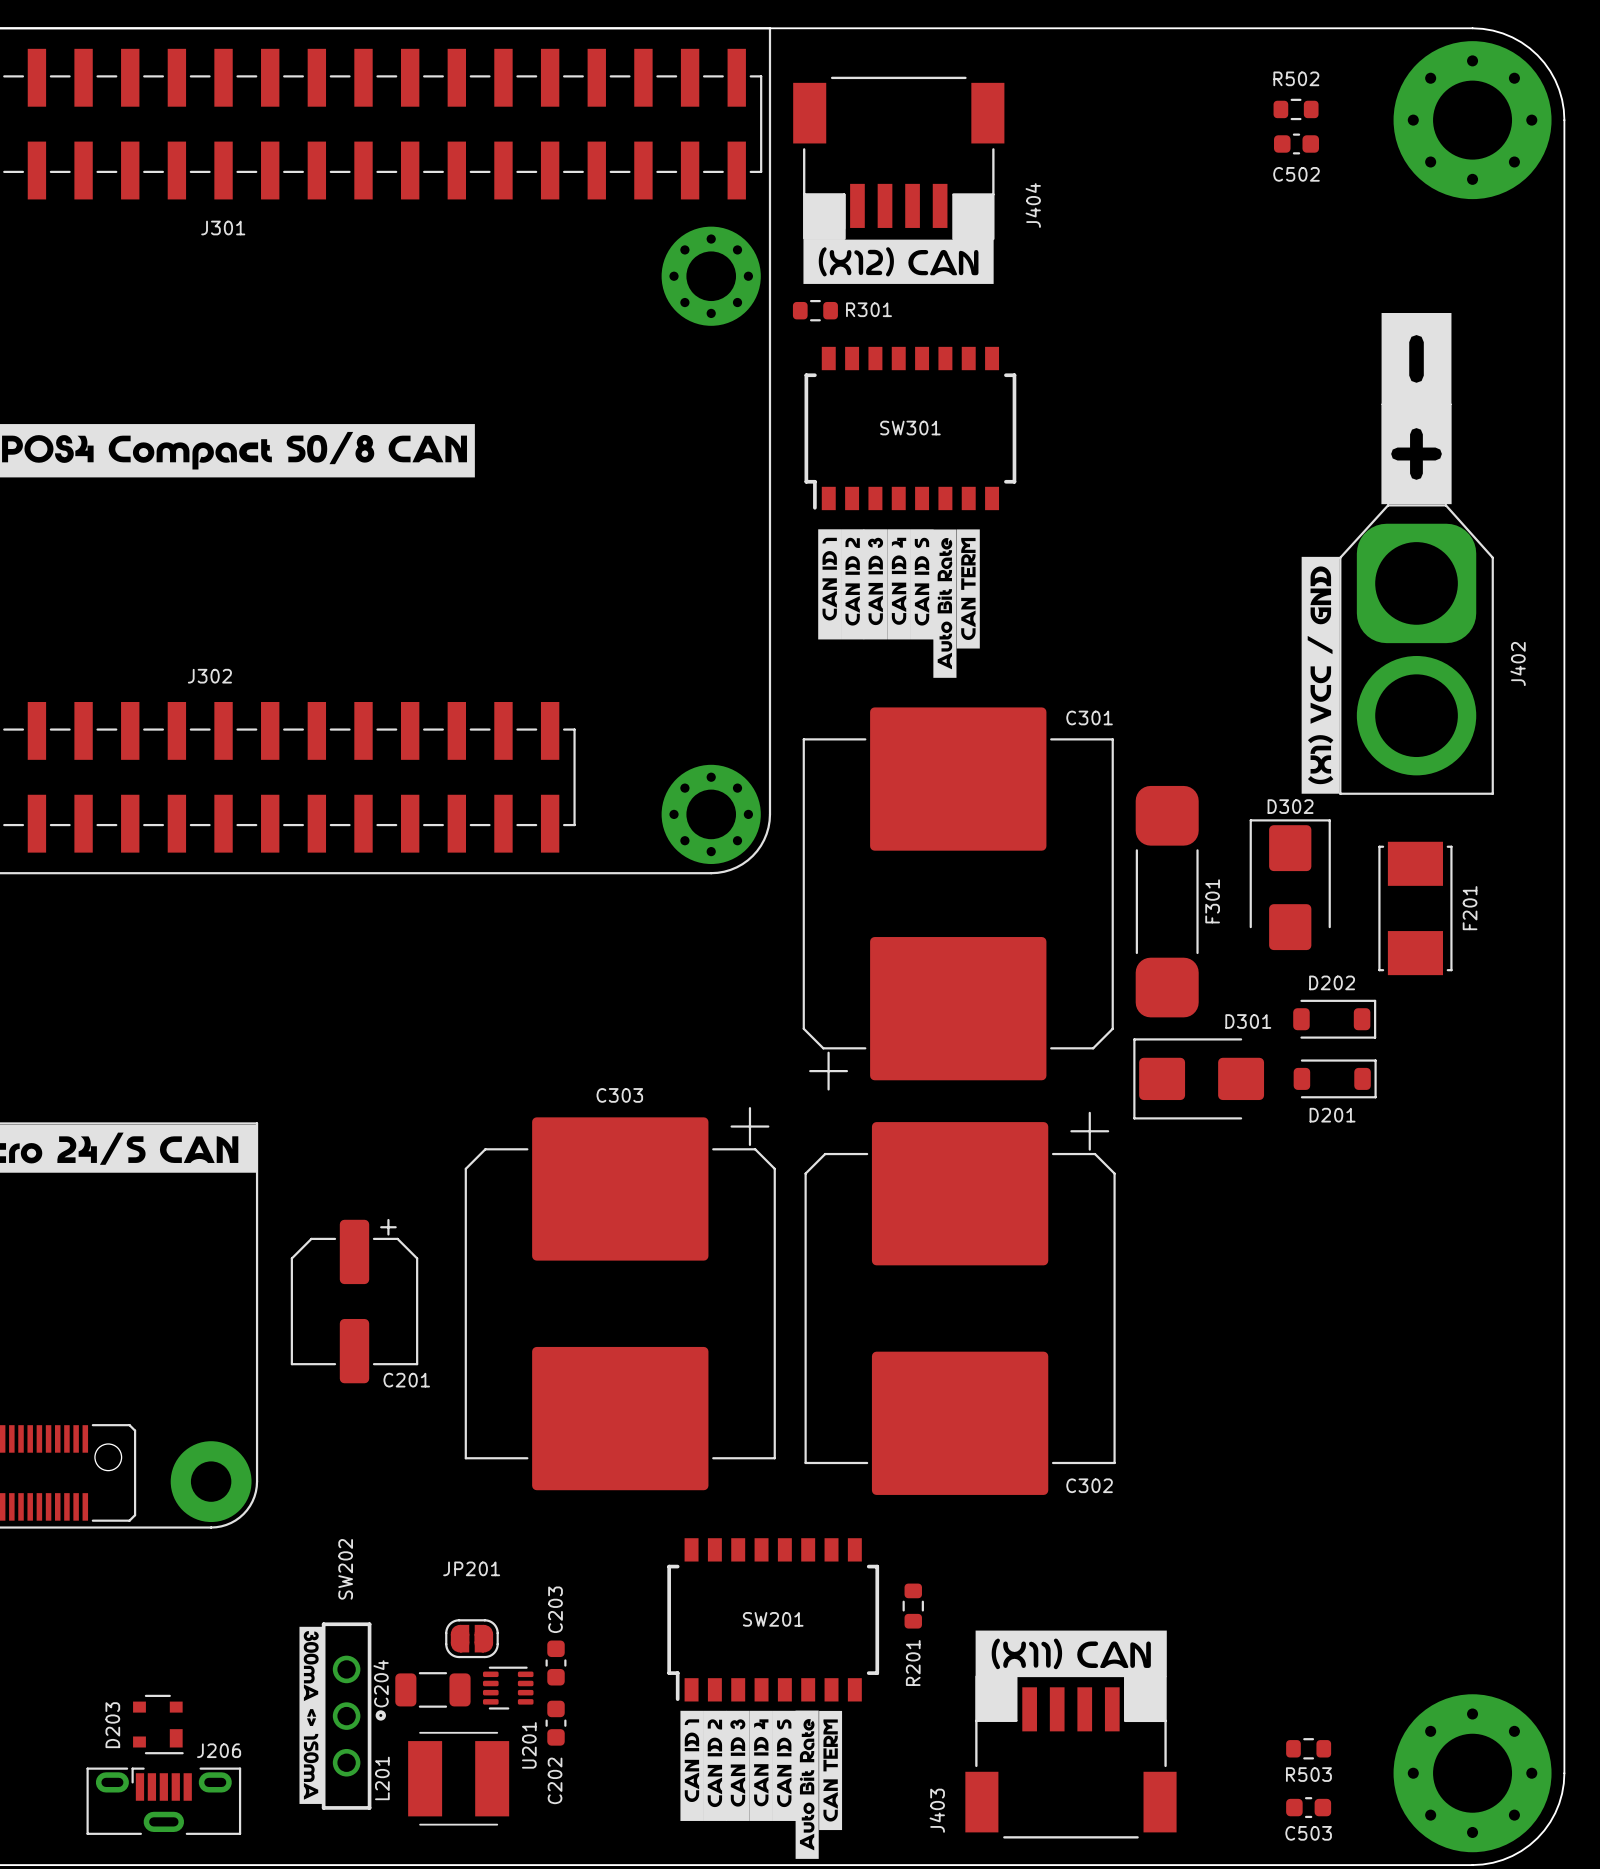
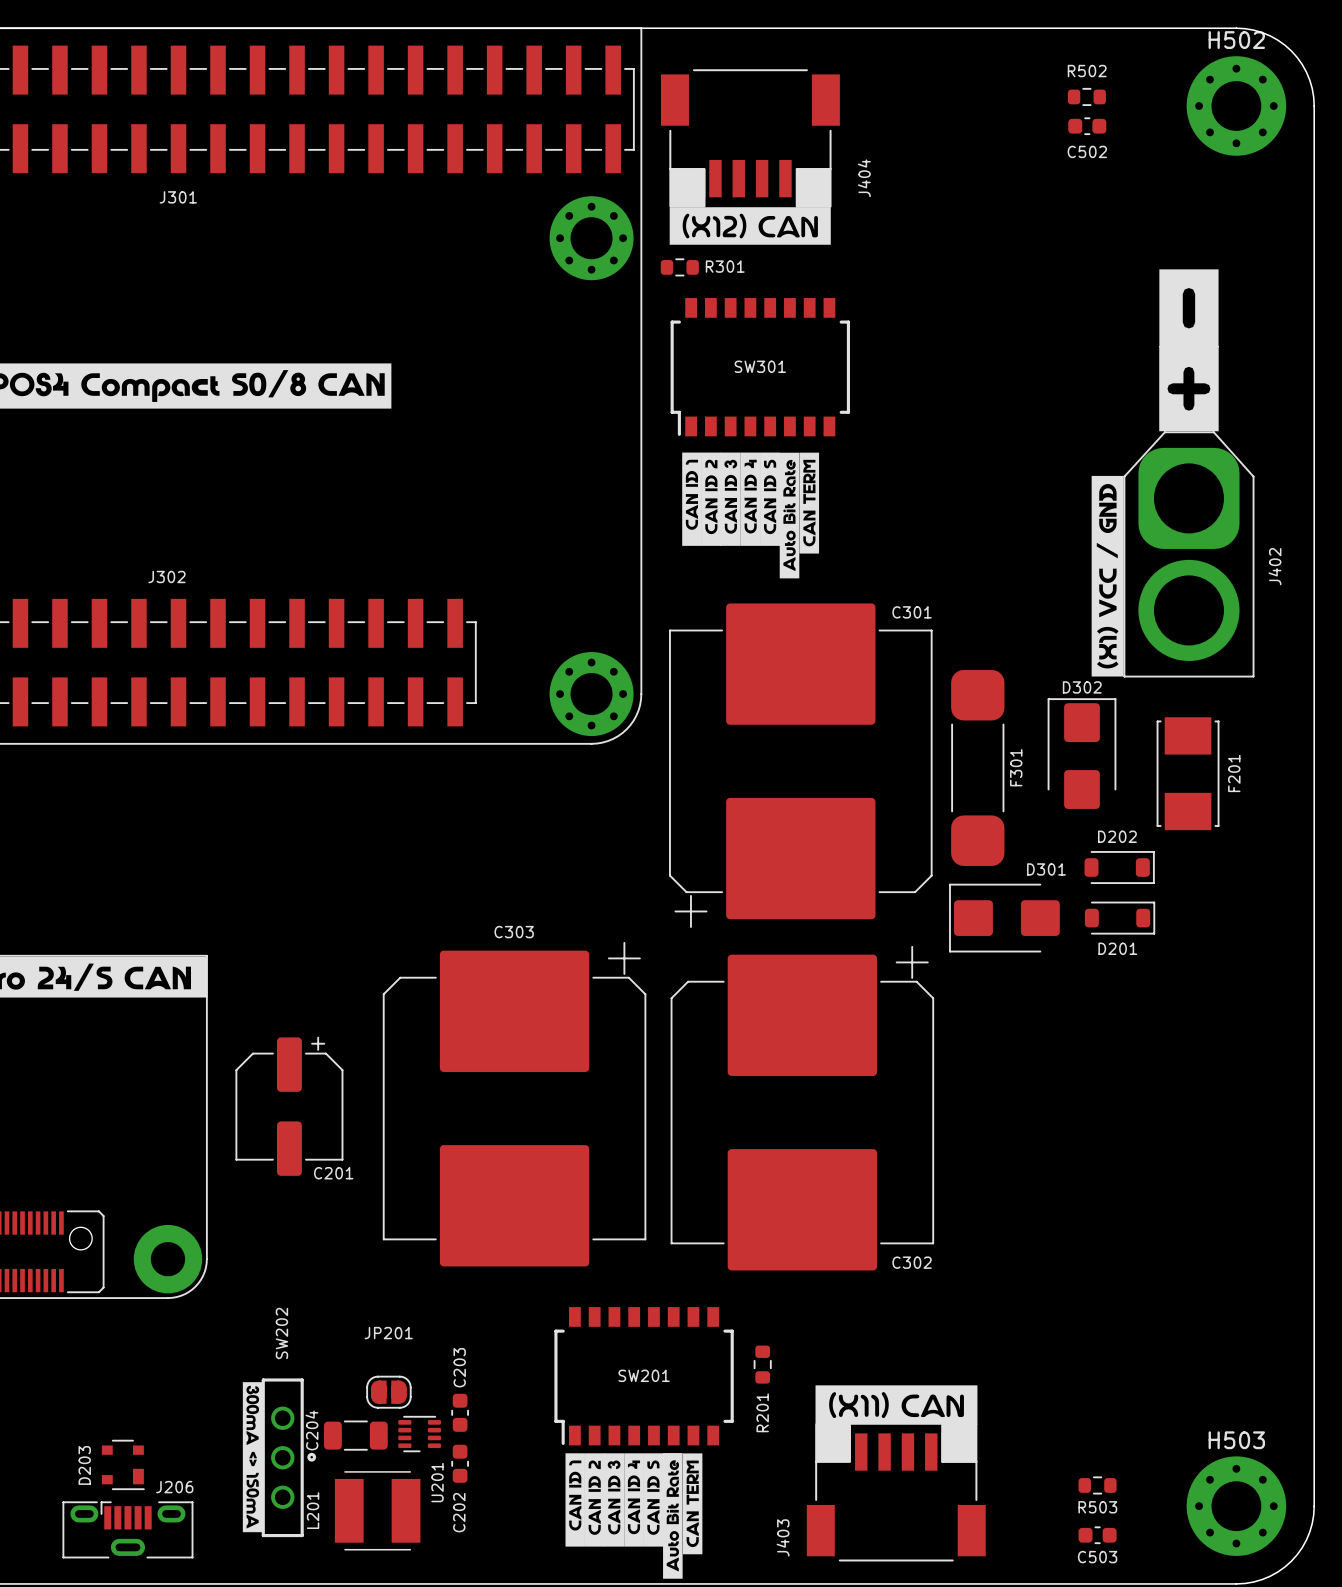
part: (1472, 120) -> none
H502: none -> (1236, 105)
part: (1472, 1773) -> none
H503: none -> (1236, 1506)

